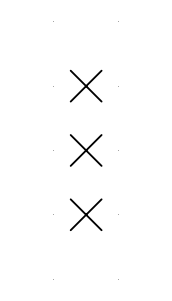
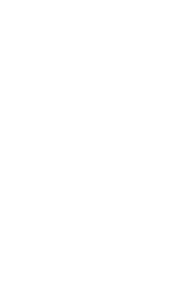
no-connect mark: (86, 86) -> none
no-connect mark: (86, 150) -> none
no-connect mark: (86, 214) -> none

